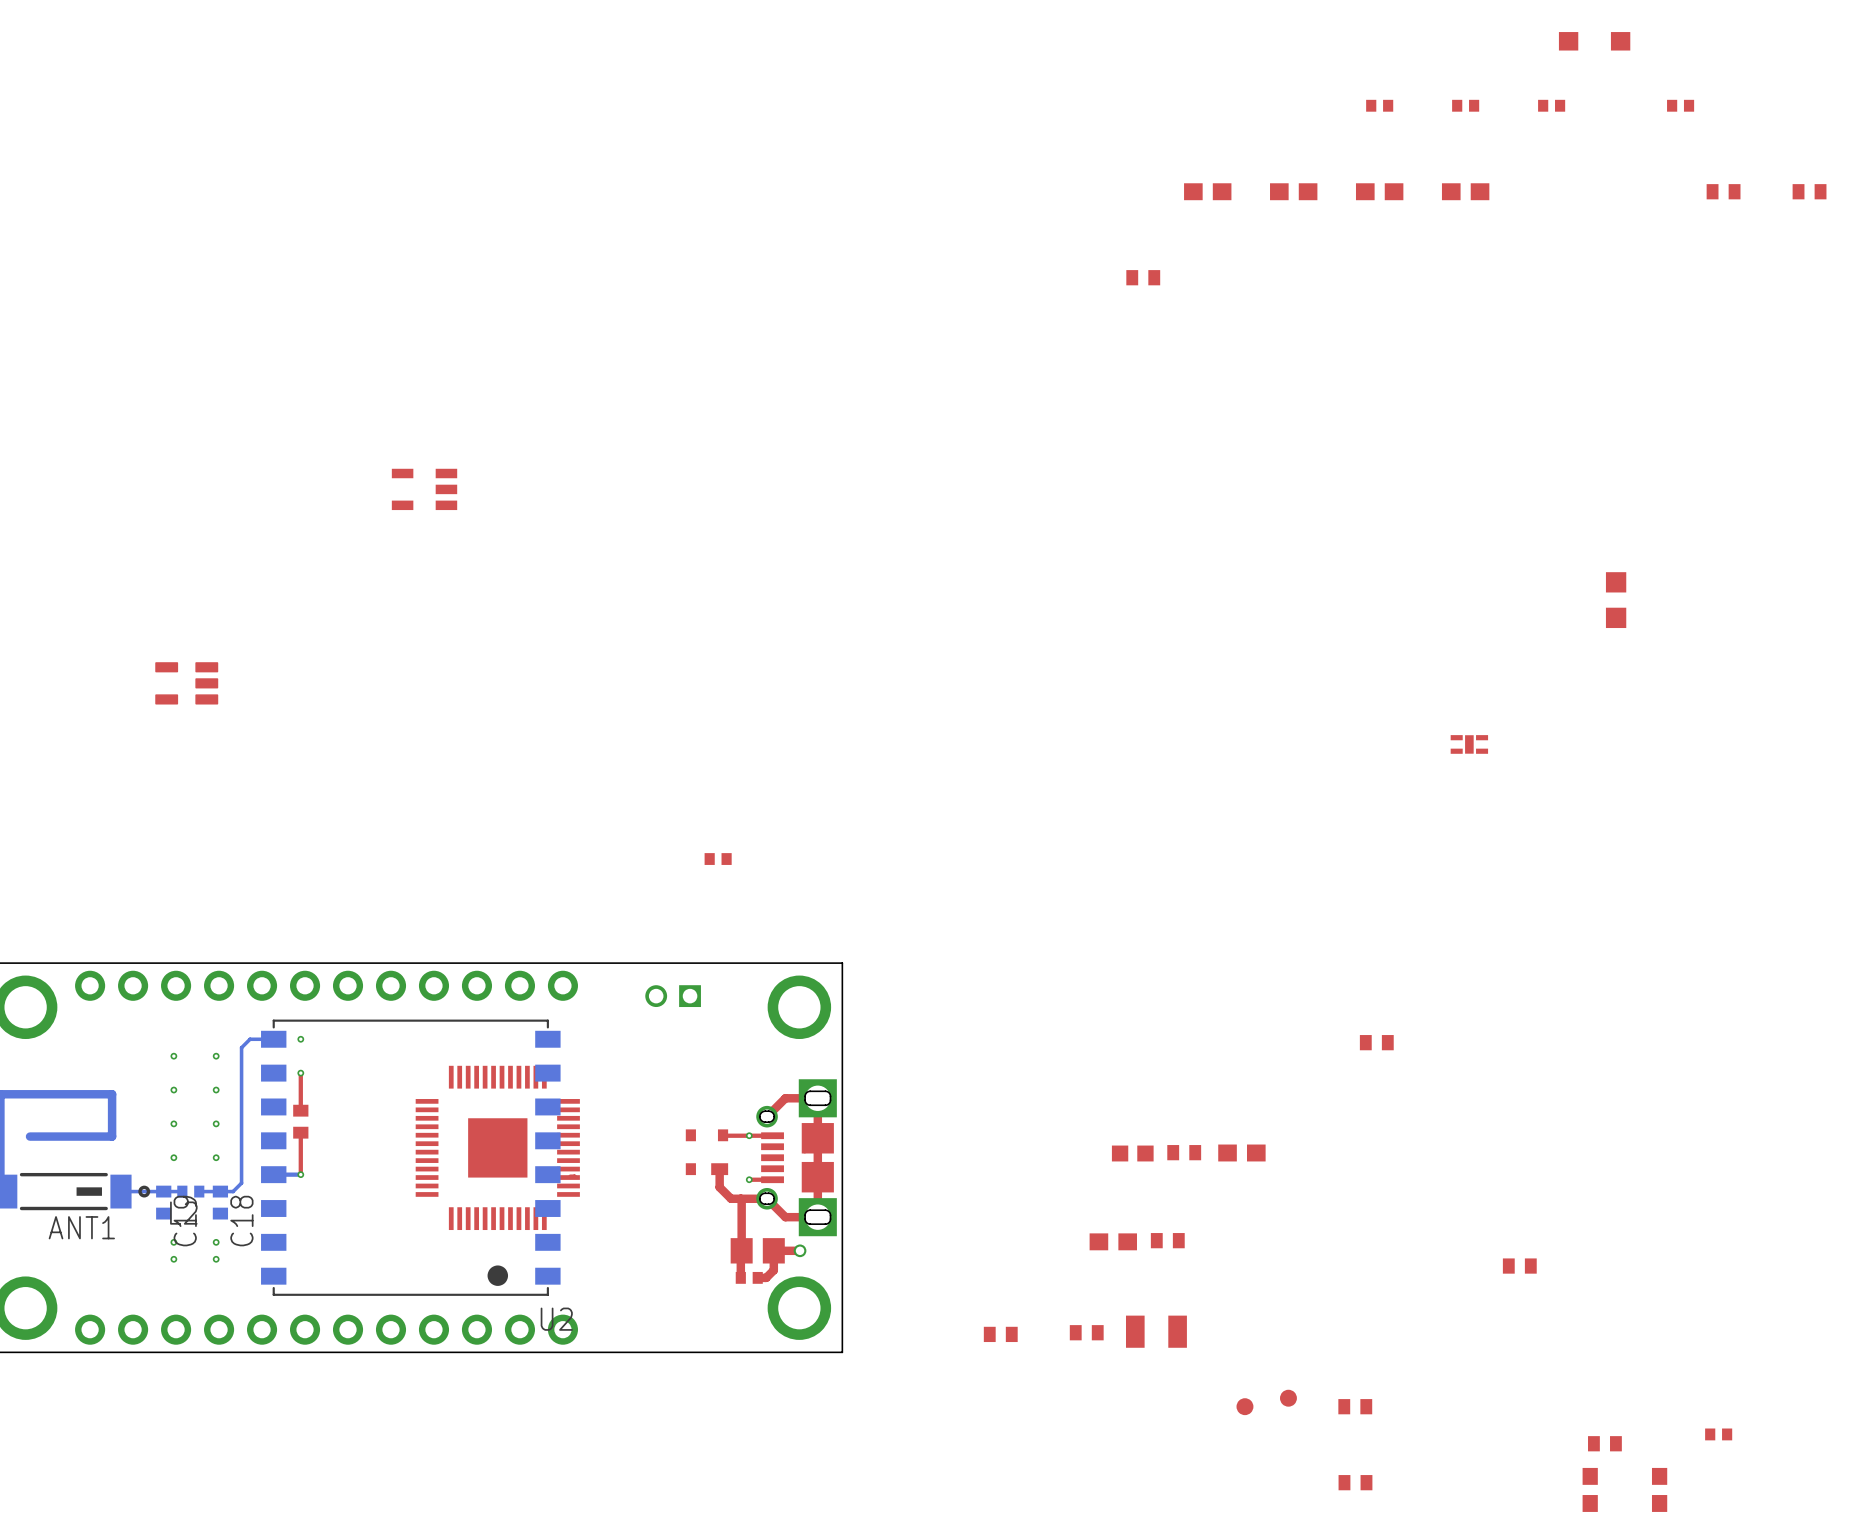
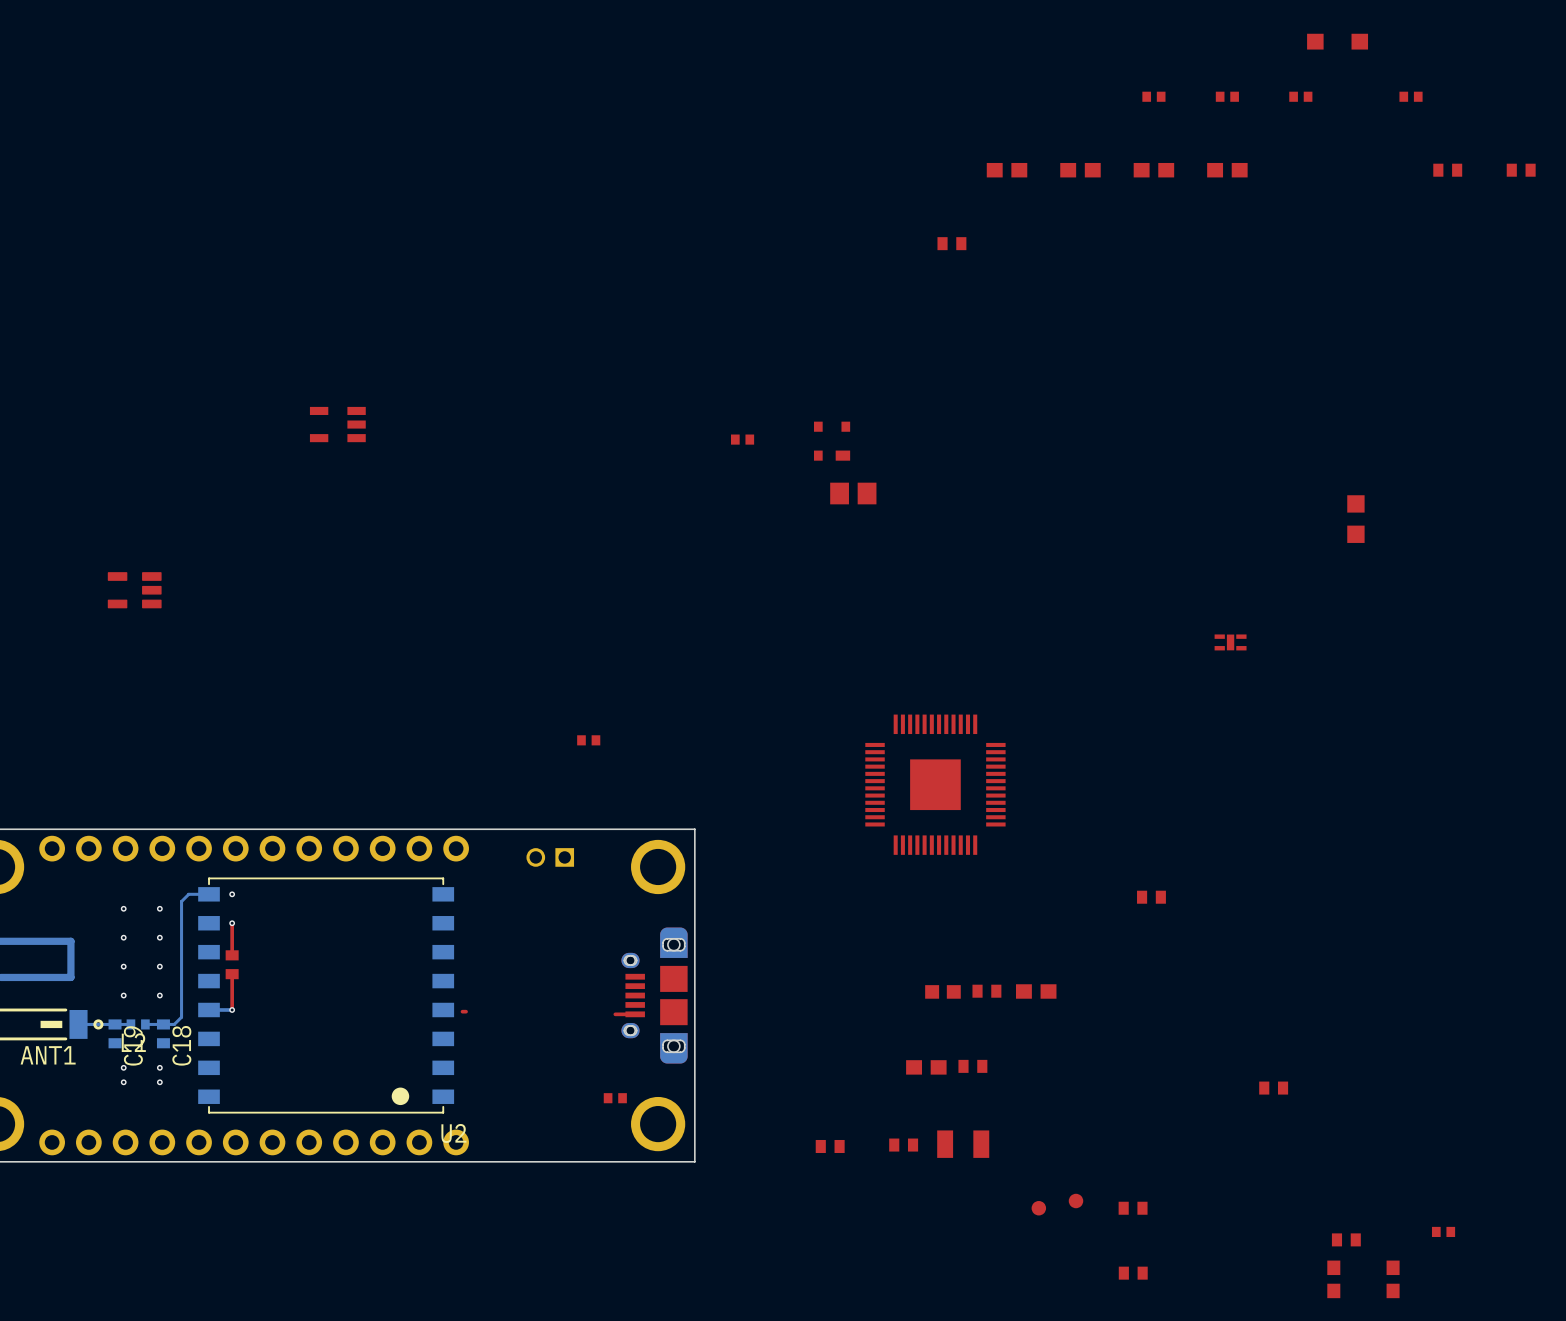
part: none -> (742, 439)
part: none -> (832, 441)
part: none -> (853, 493)
part: none -> (935, 784)
part footprint: [756, 1079, 837, 1237] -> [621, 927, 688, 1064]
top track: (767, 1116) (785, 1098) (817, 1098) (817, 1217) (785, 1217) (767, 1198) (731, 1198) (719, 1187) (719, 1169) -> none
top track: (723, 1135) (772, 1135) -> none
via: (749, 1135) -> none
part: (497, 1147) -> none
part: (706, 1152) -> none
via: (749, 1179) -> none
top track: (740, 1198) (740, 1277) -> none
part: (757, 1250) -> none
top track: (800, 1250) (773, 1250) (773, 1270) (766, 1277) (757, 1277) -> none
via: (800, 1250) -> none

